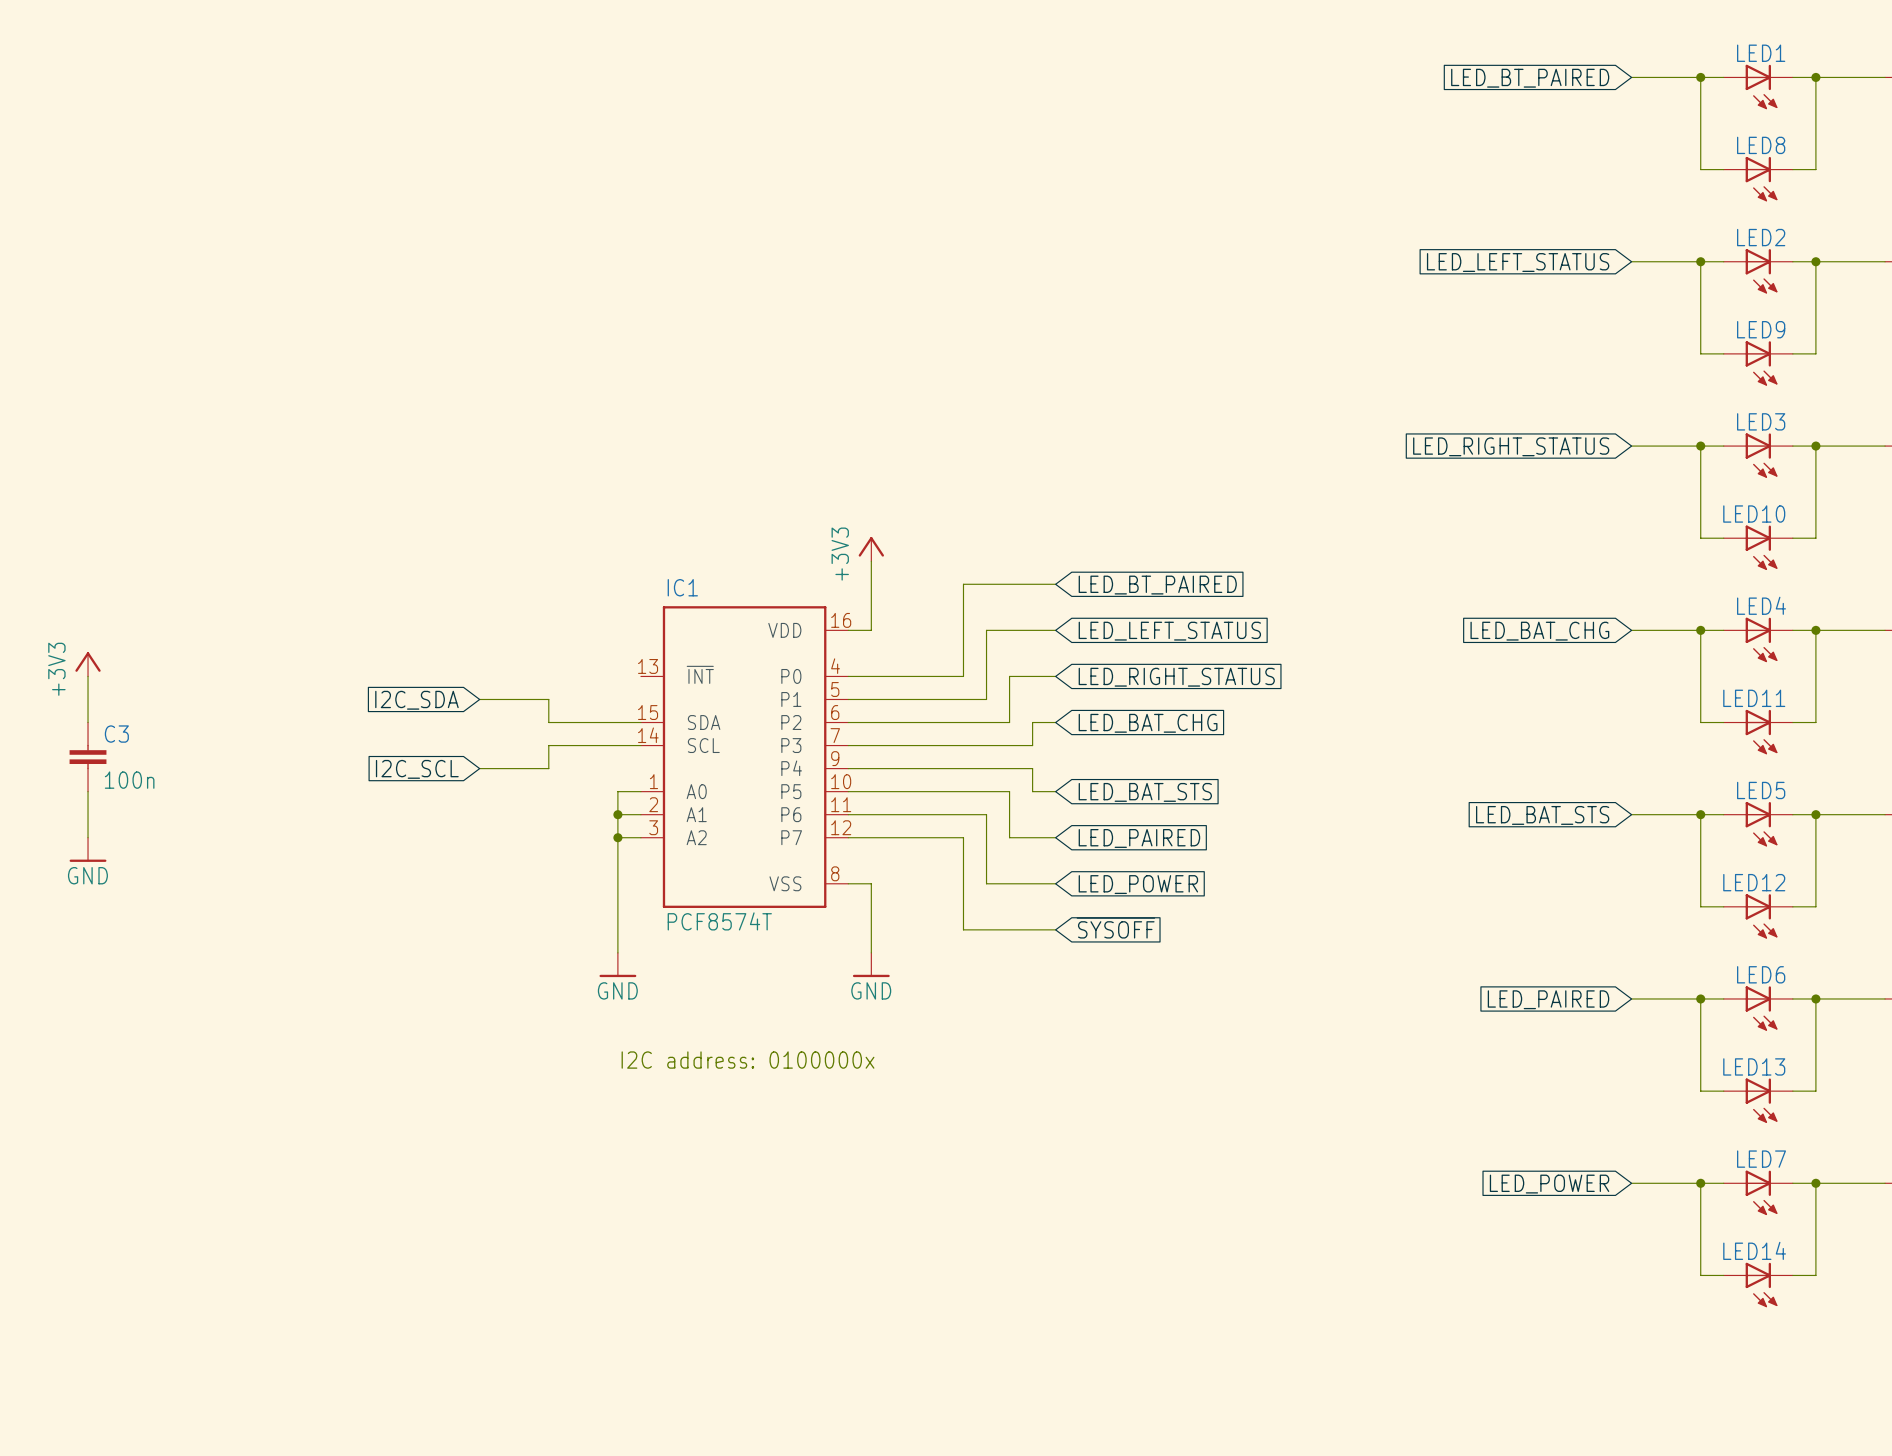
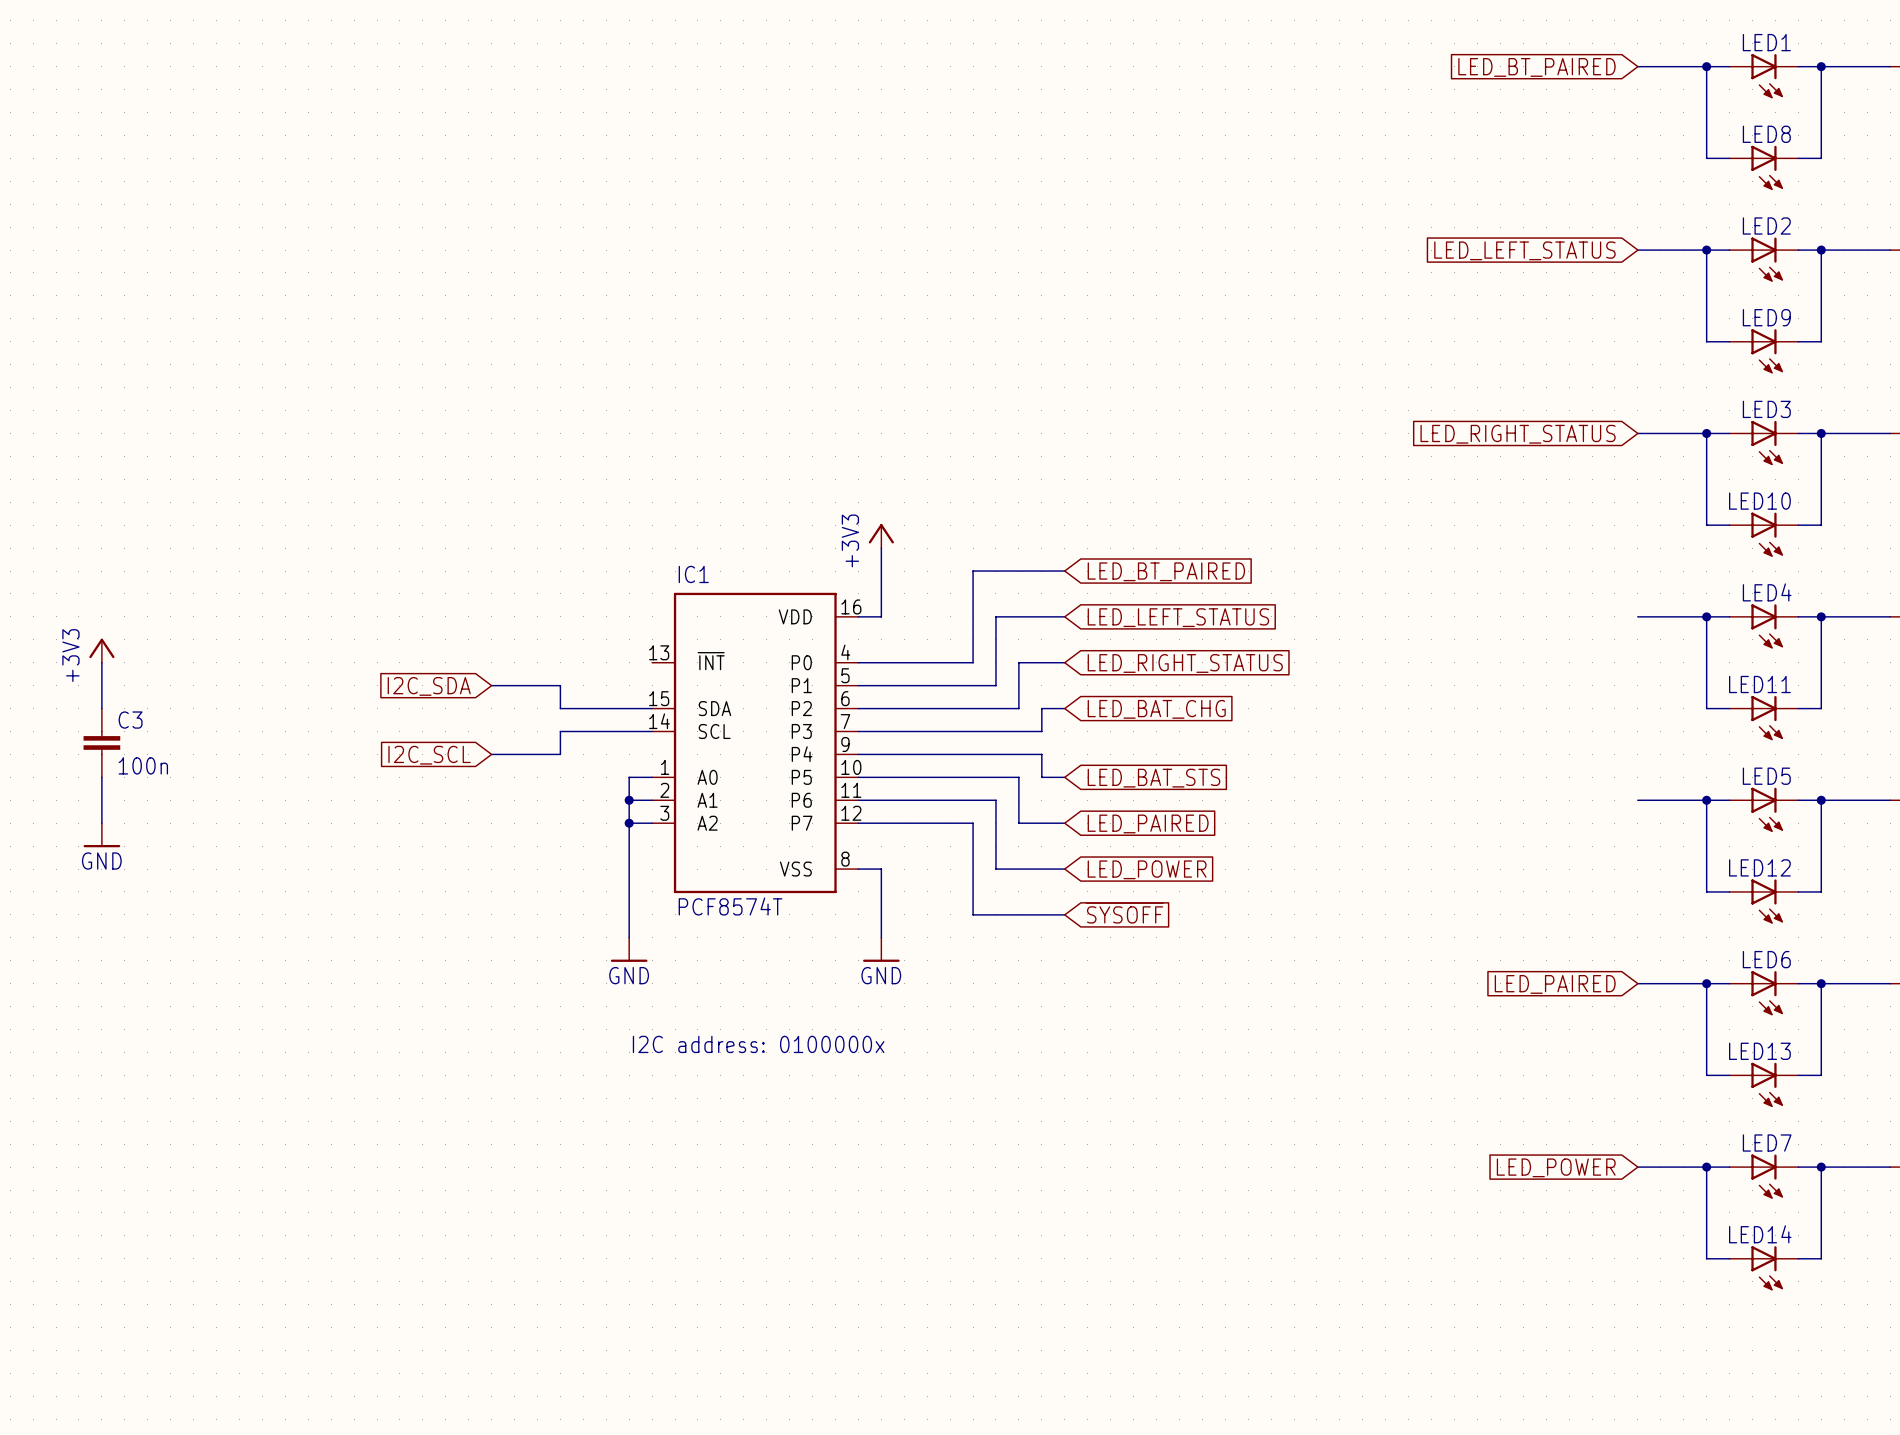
global label: LED_BAT_CHG (1539, 631) -> none
global label: LED_BAT_STS (1542, 815) -> none

